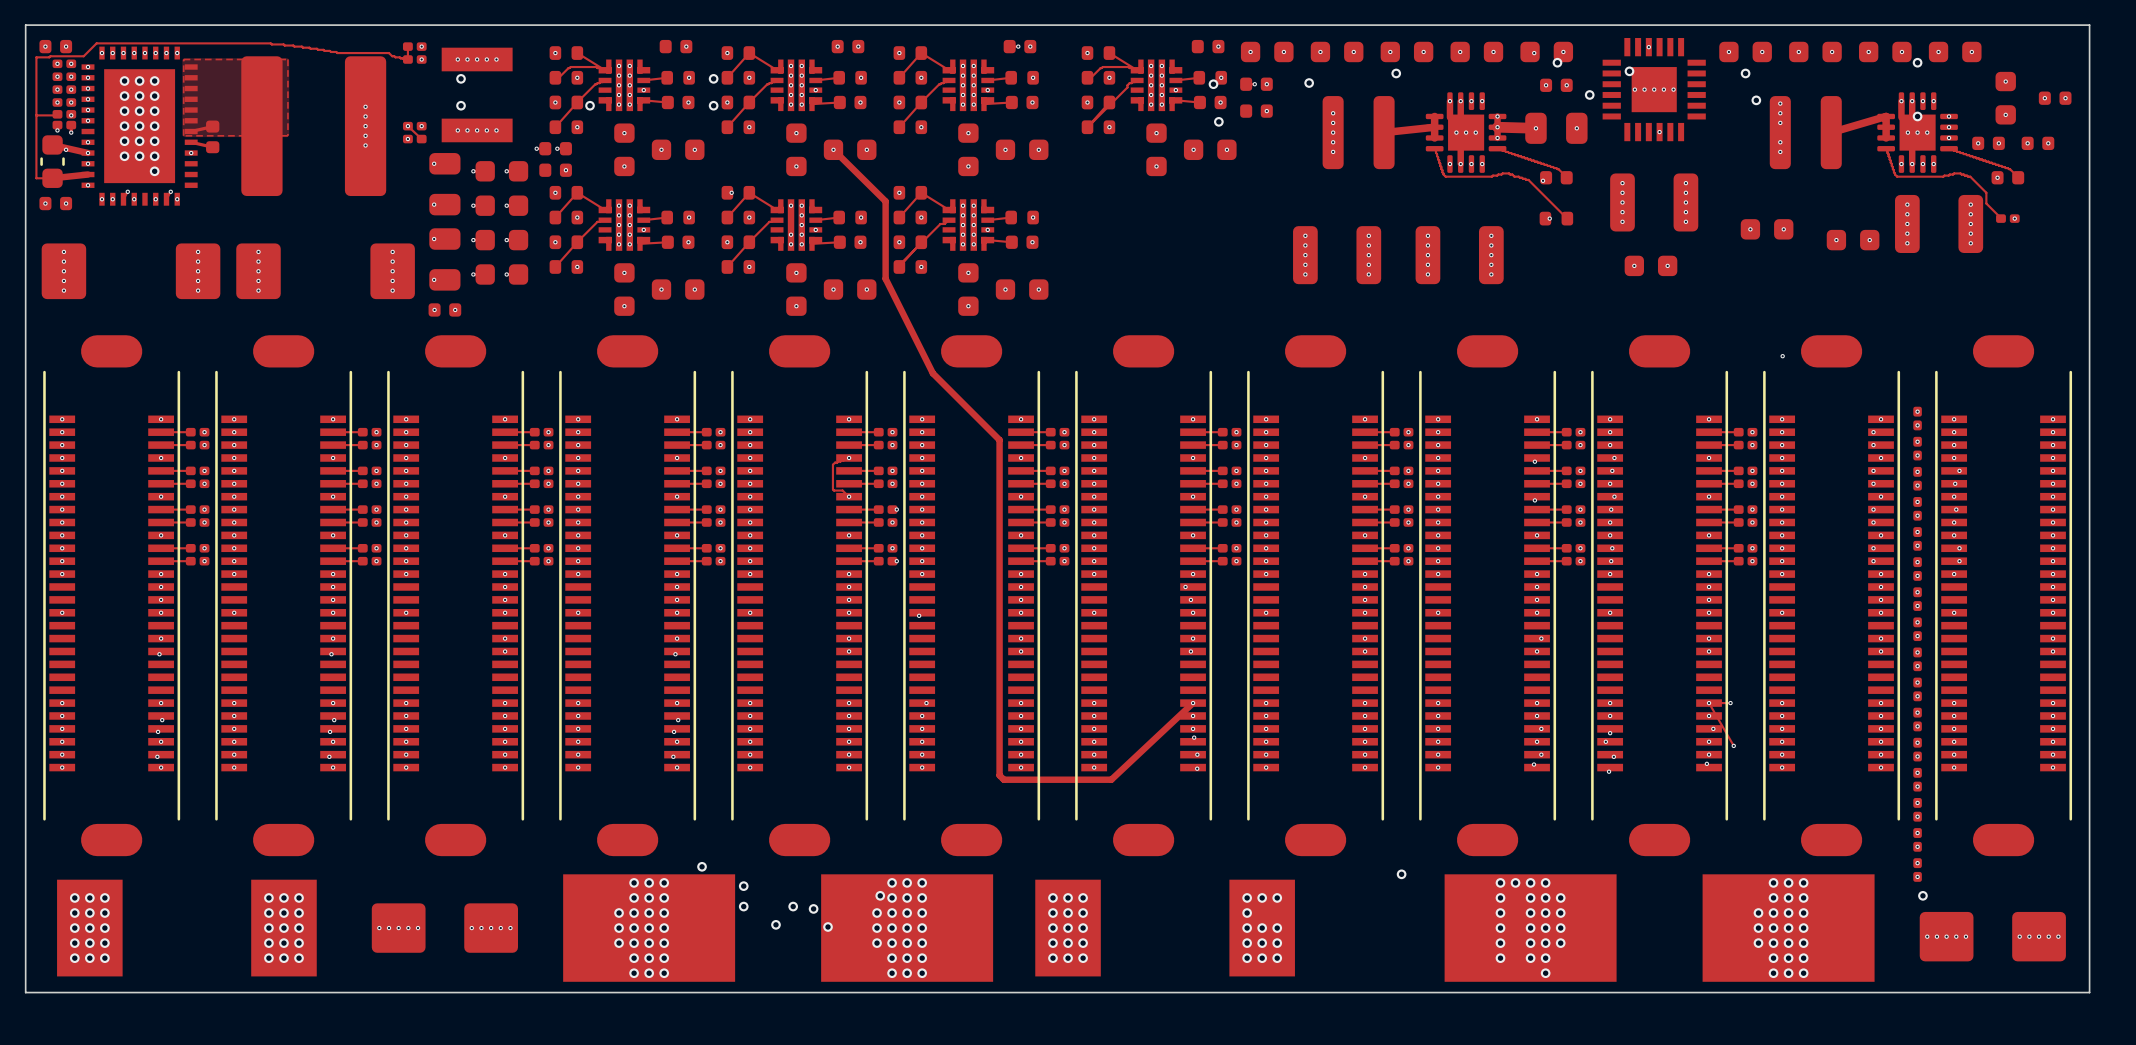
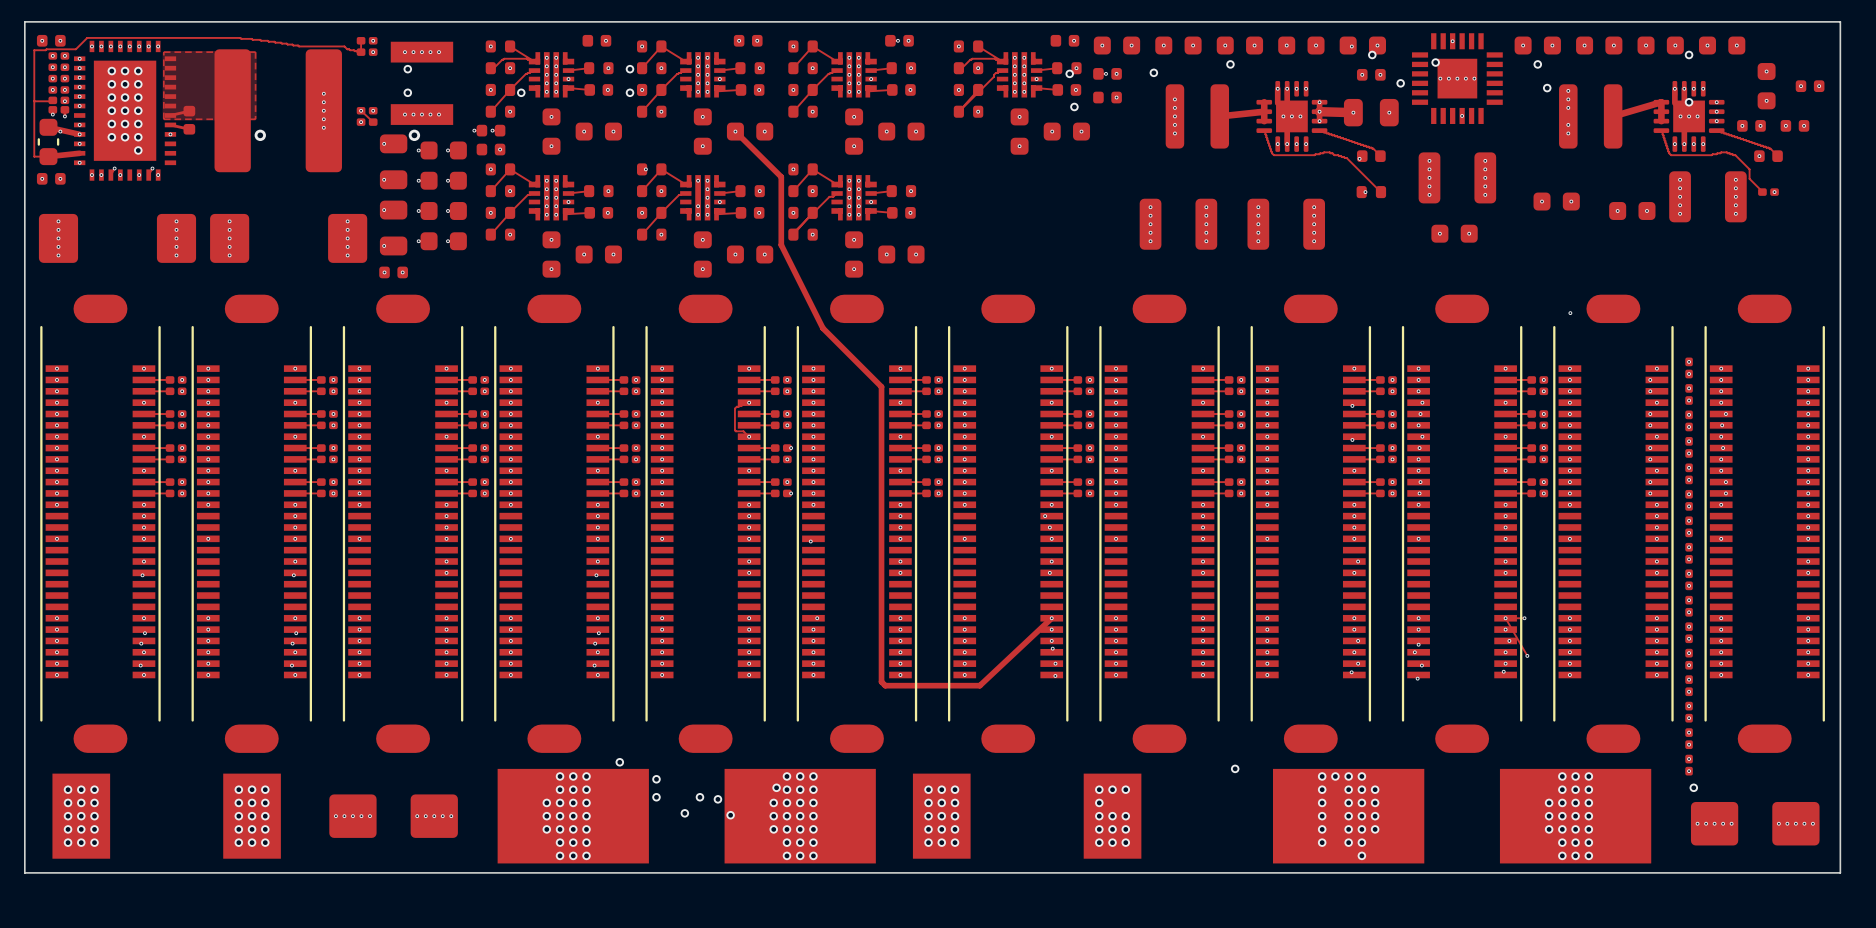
via: none -> (260, 135)
via: none -> (414, 135)

